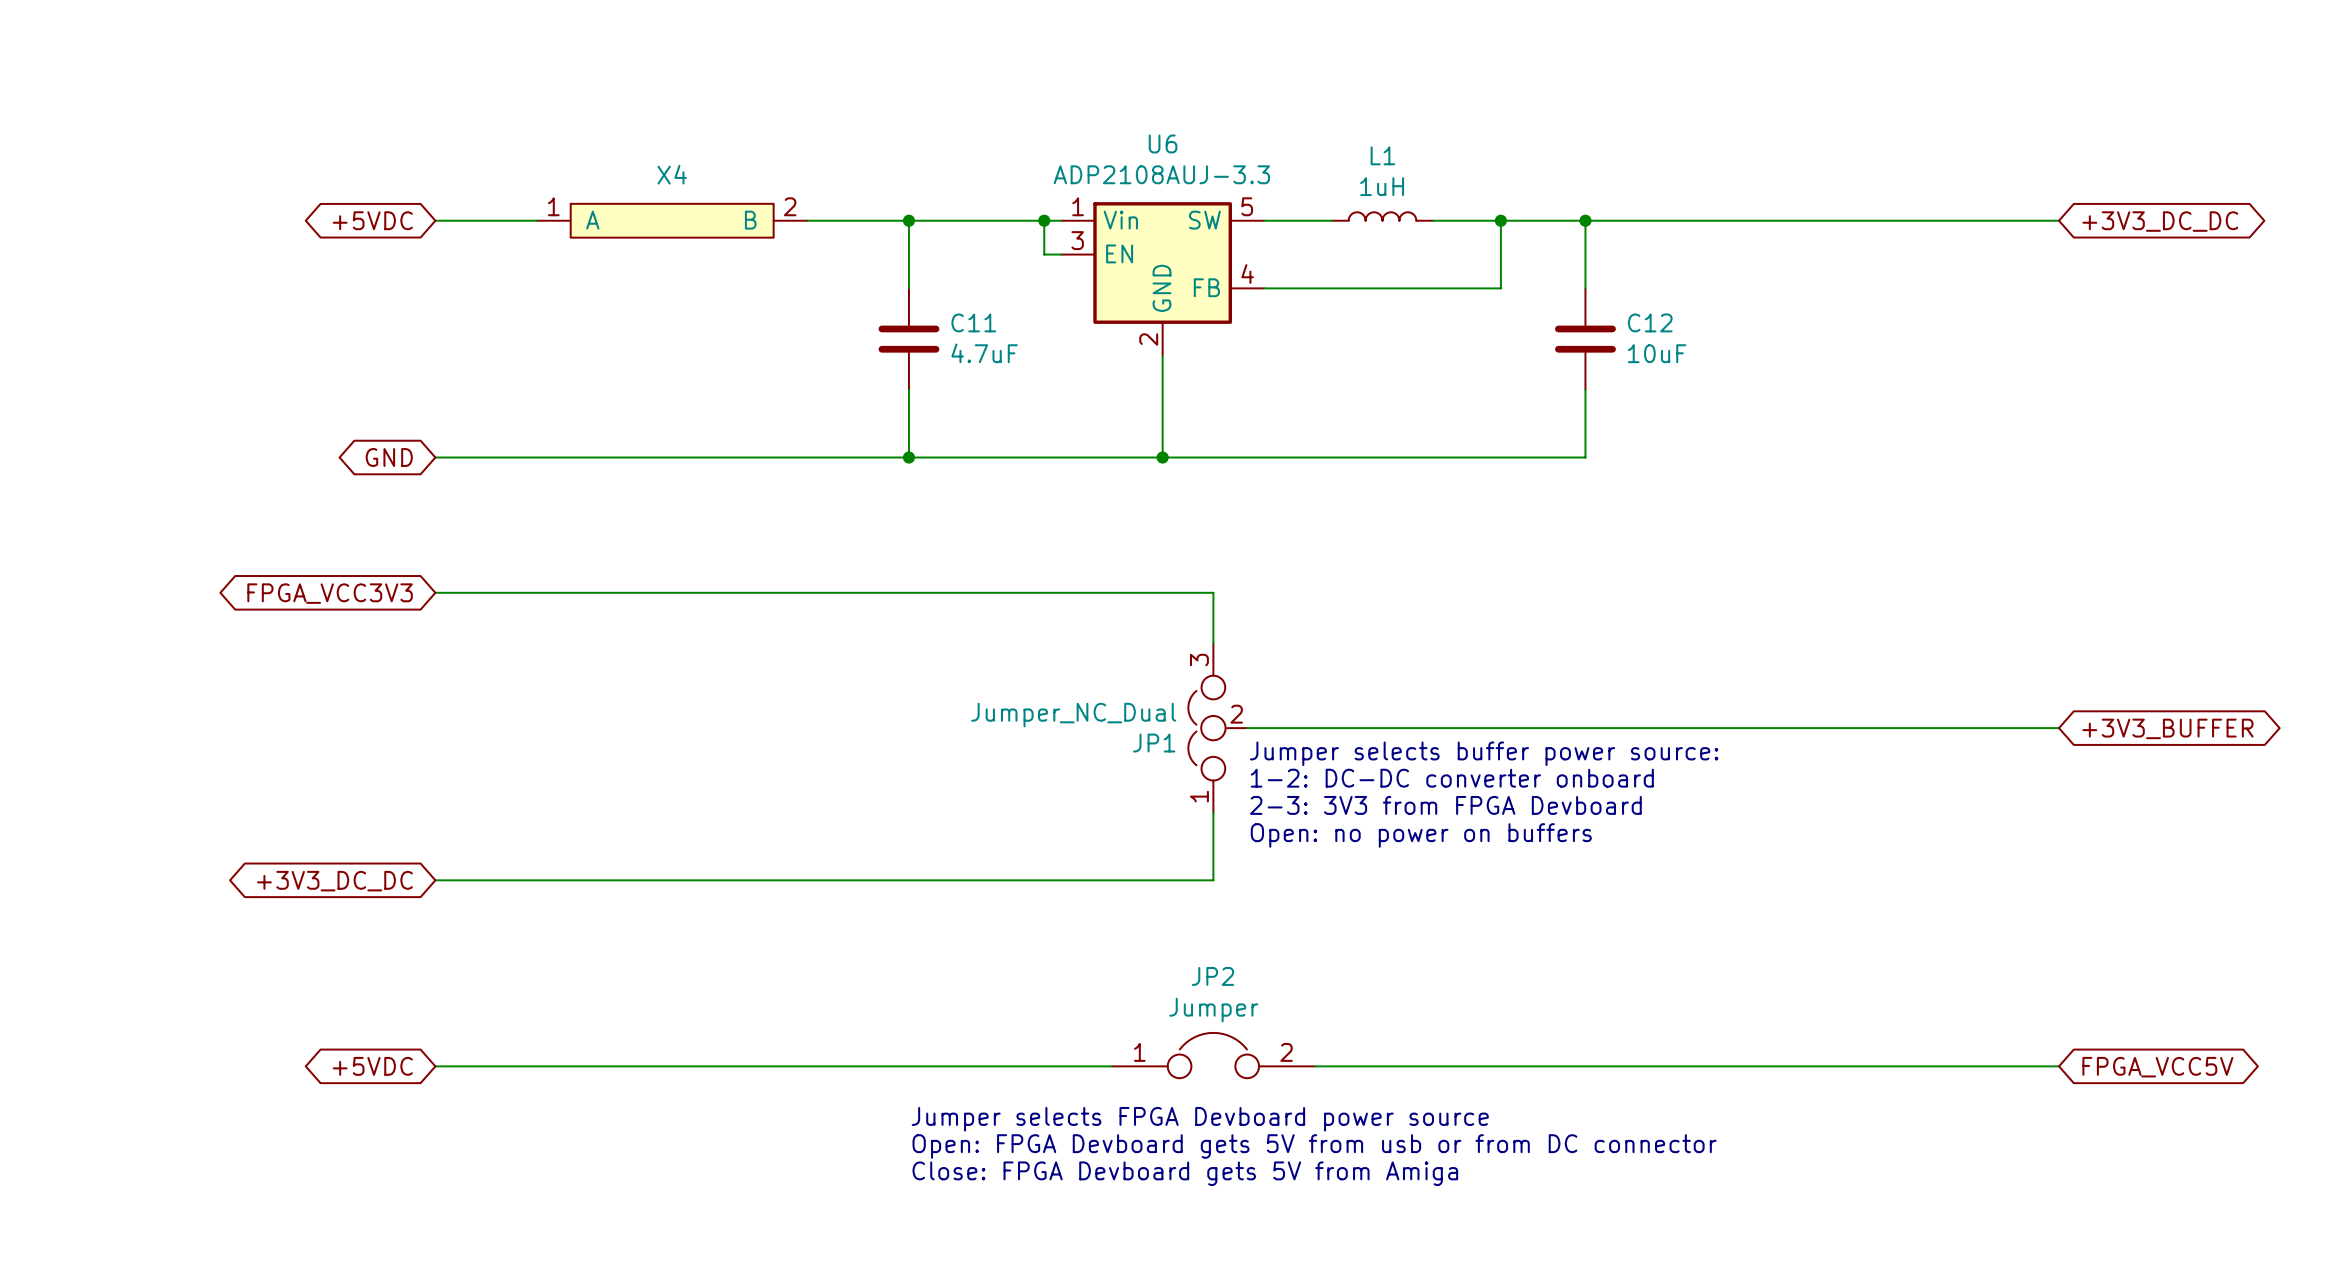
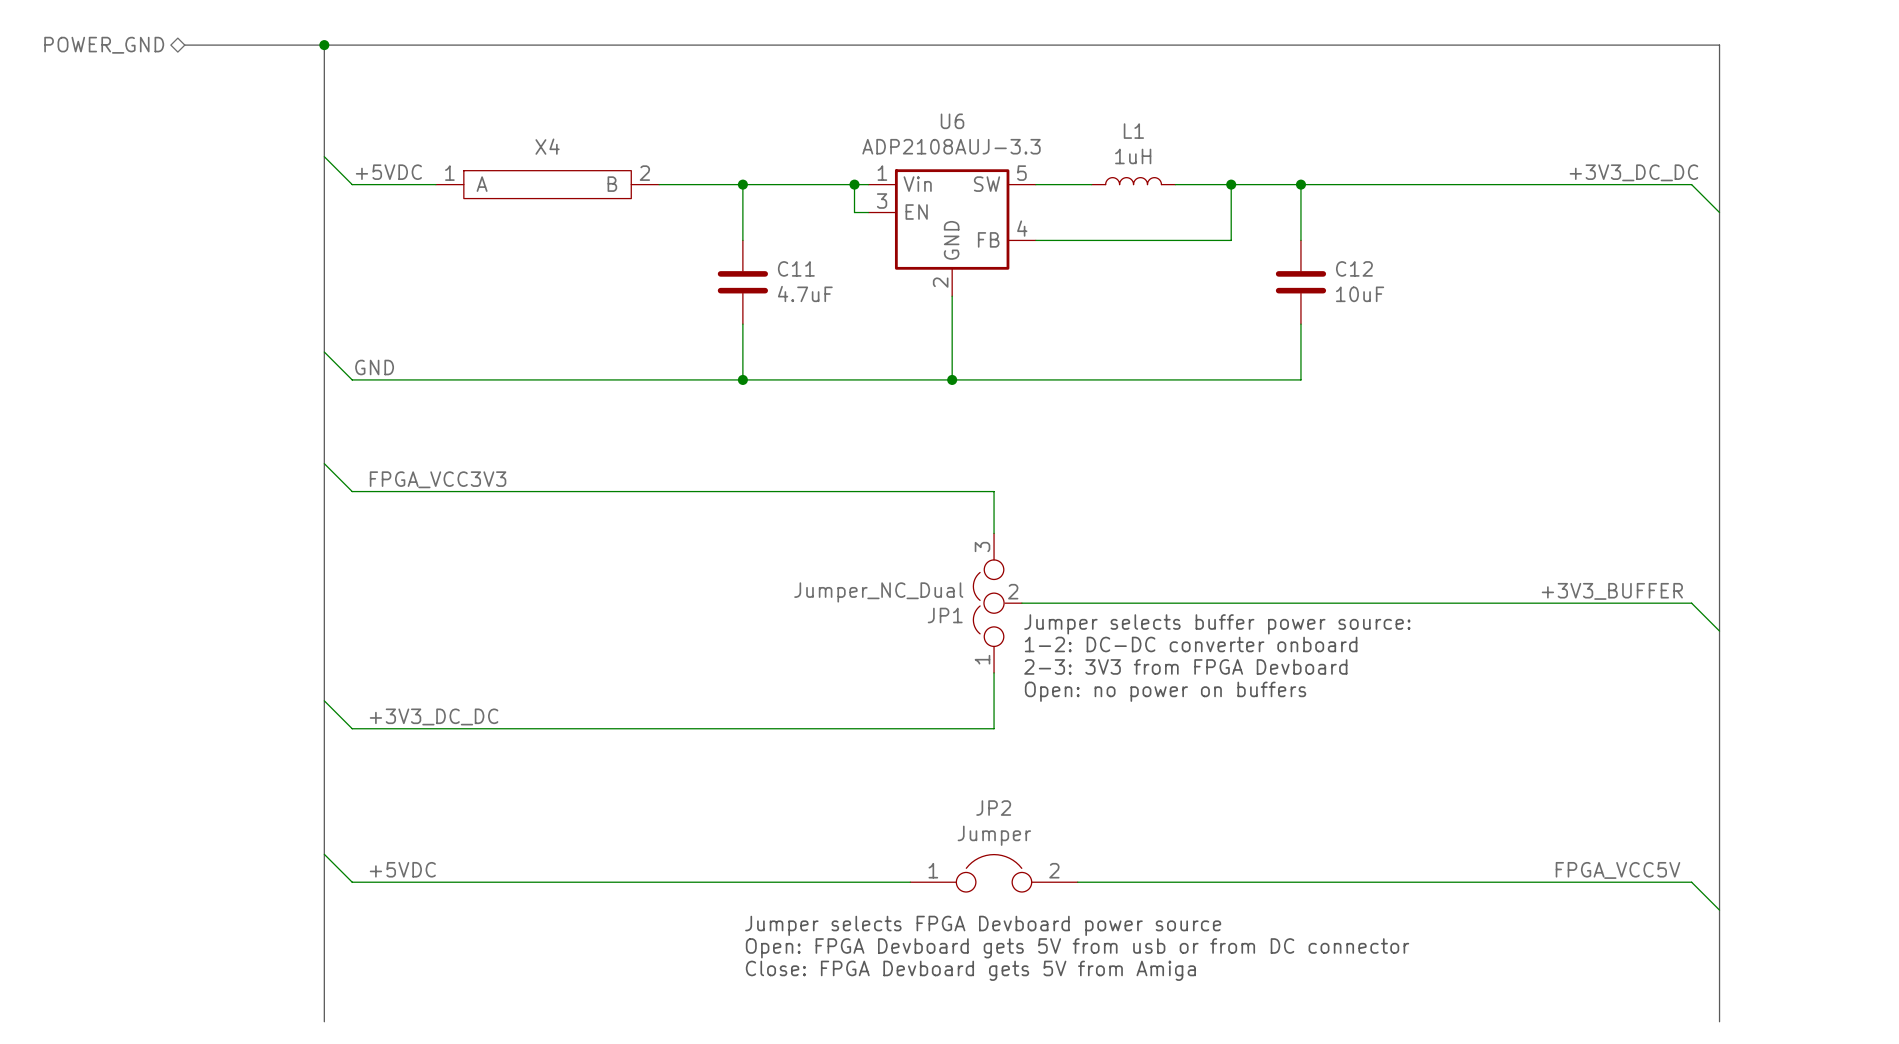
hierarchical label: none -> POWER_GND (104, 45)
bus: none -> (184, 45) (1719, 45) (1719, 1021)
bus: none -> (324, 45) (324, 1021)
junction: none -> (324, 45)
wire: none -> (324, 156) (352, 184)
label: none -> +5VDC (388, 172)
label: none -> +3V3_DC_DC (1633, 172)
global label: +5VDC (372, 220) -> none
wire: none -> (1691, 184) (1719, 212)
global label: +3V3_DC_DC (2160, 221) -> none
wire: none -> (324, 352) (352, 379)
label: none -> GND (374, 367)
global label: GND (389, 457) -> none
wire: none -> (324, 463) (352, 491)
label: none -> FPGA_VCC3V3 (438, 479)
global label: FPGA_VCC3V3 (330, 593) -> none
label: none -> +3V3_BUFFER (1612, 591)
wire: none -> (1691, 603) (1719, 631)
global label: +3V3_BUFFER (2167, 728) -> none
wire: none -> (324, 700) (352, 728)
label: none -> +3V3_DC_DC (434, 716)
global label: +3V3_DC_DC (334, 881) -> none
wire: none -> (324, 854) (352, 882)
label: none -> +5VDC (402, 869)
label: none -> FPGA_VCC5V (1617, 870)
global label: +5VDC (372, 1066) -> none
wire: none -> (1691, 882) (1719, 910)
global label: FPGA_VCC5V (2157, 1067) -> none

